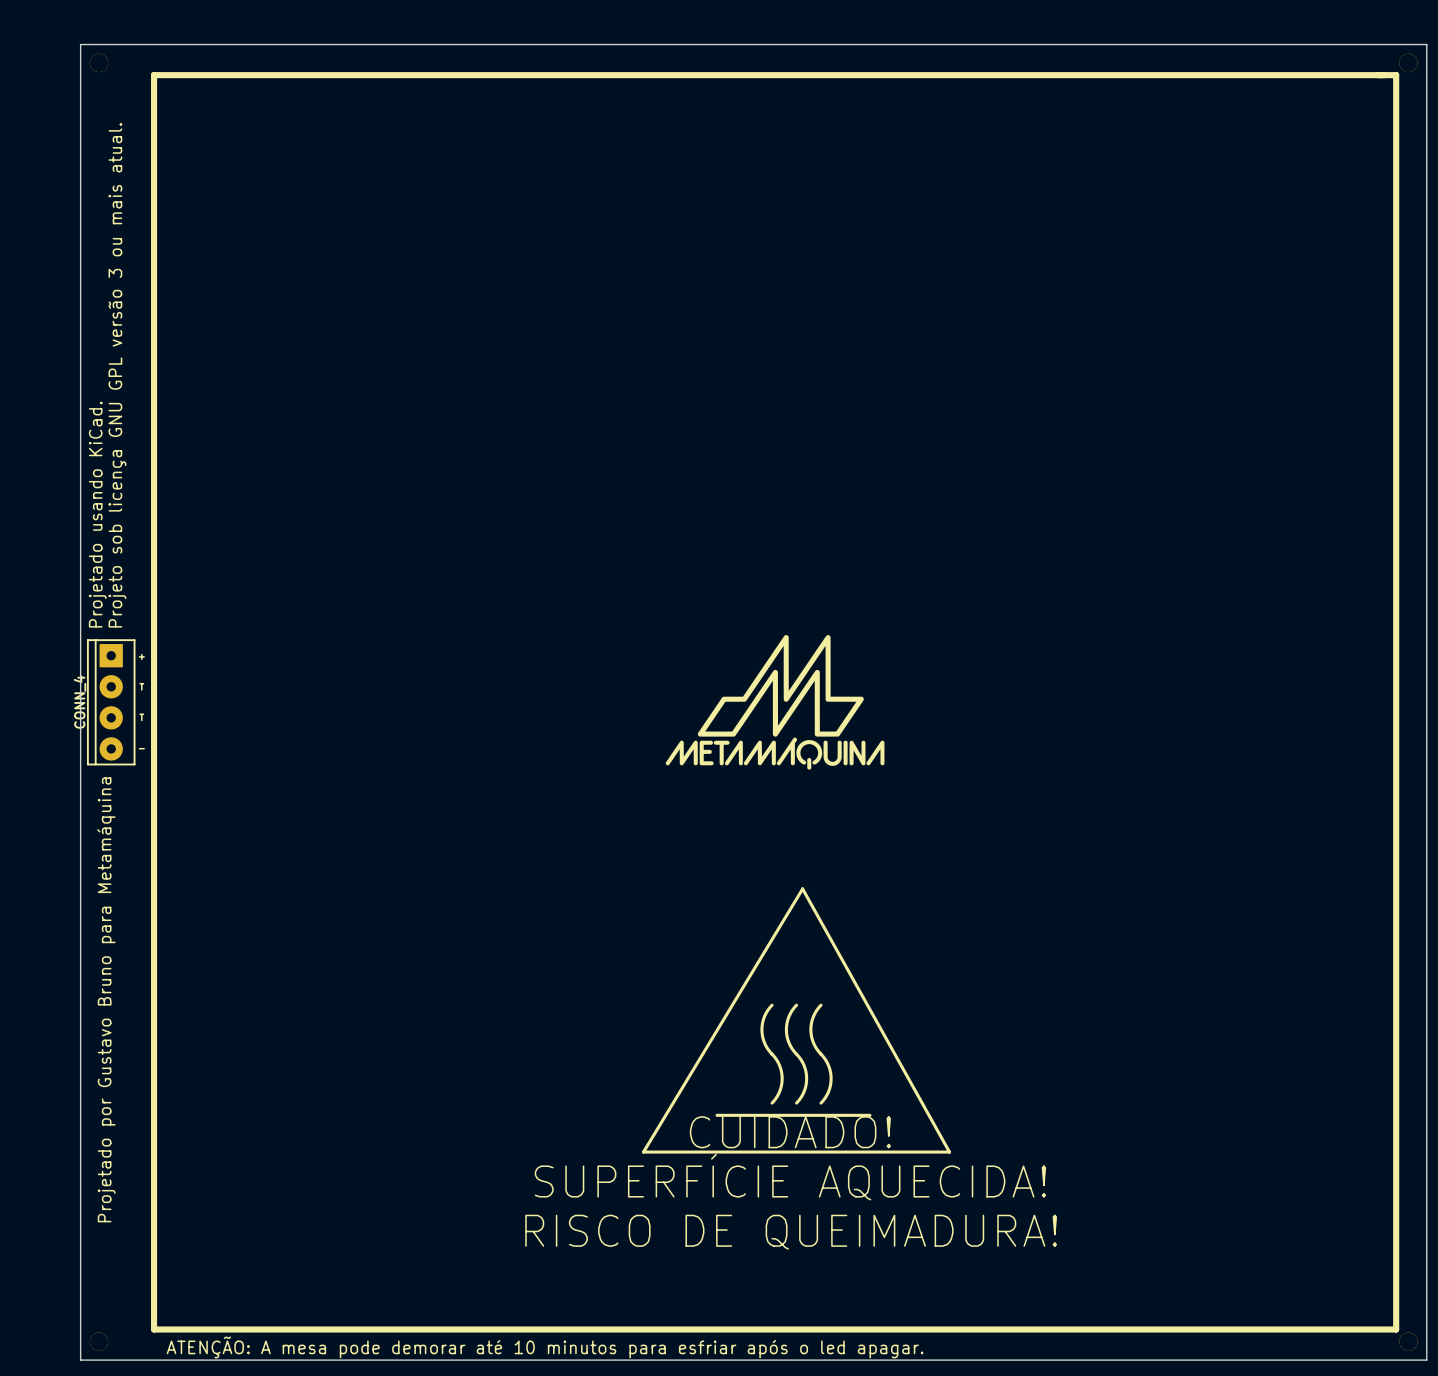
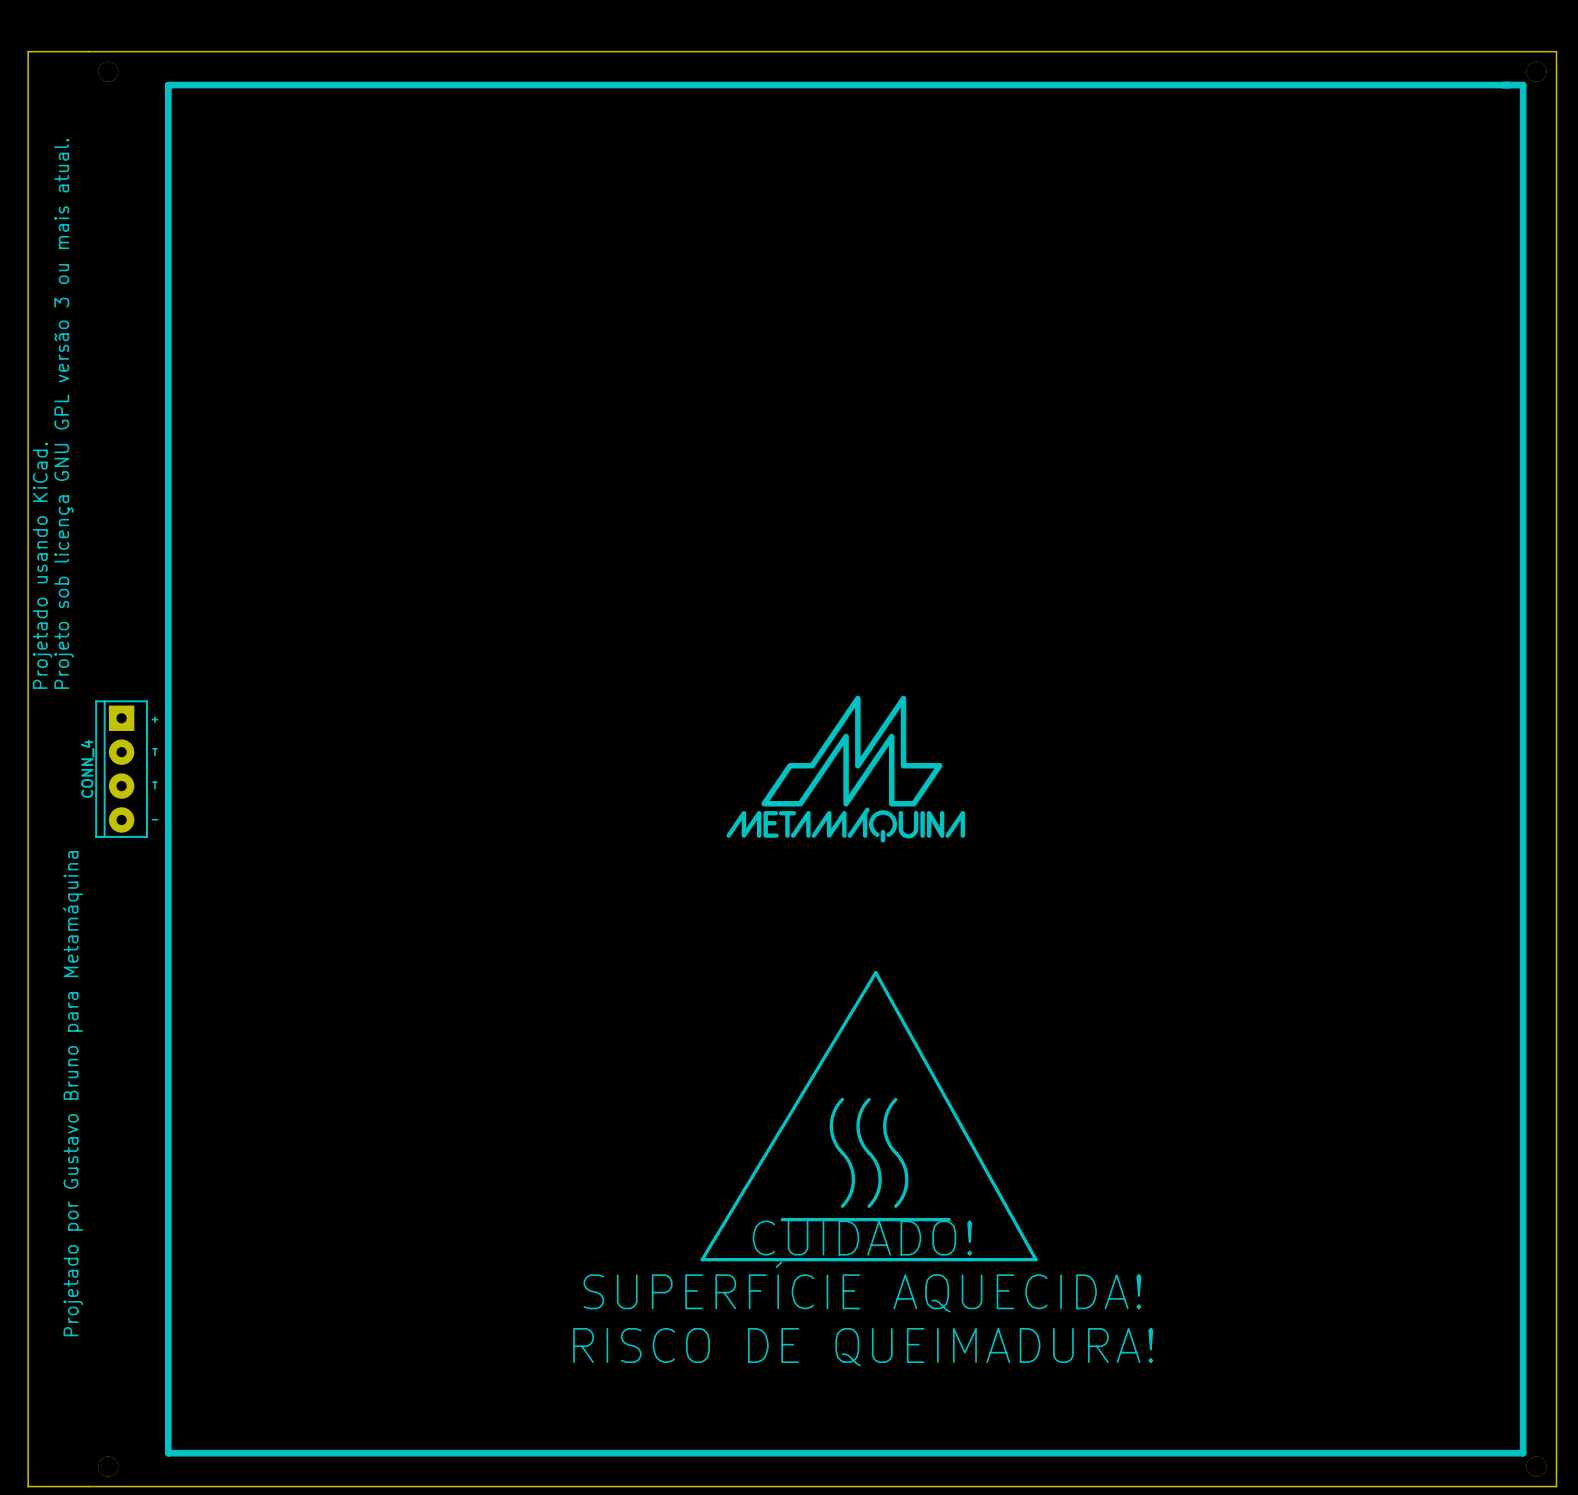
board edge: (80, 44) (80, 1360) -> (88, 51) (28, 51) (28, 1486) (88, 1486)
text position: Projeto sob licença GNU GPL versão 3 ou mais atual. (117, 375) -> Projeto sob licença GNU GPL versão 3 ou mais atual. (64, 413)
text position: Projetado usando KiCad. (97, 514) -> Projetado usando KiCad. (42, 565)
text position: Projetado por Gustavo Bruno para Metamáquina (106, 999) -> Projetado por Gustavo Bruno para Metamáquina (72, 1093)
text: ATENÇÃO: A mesa pode demorar até 10 minutos para esfriar após o led apagar. (545, 1347) -> none

